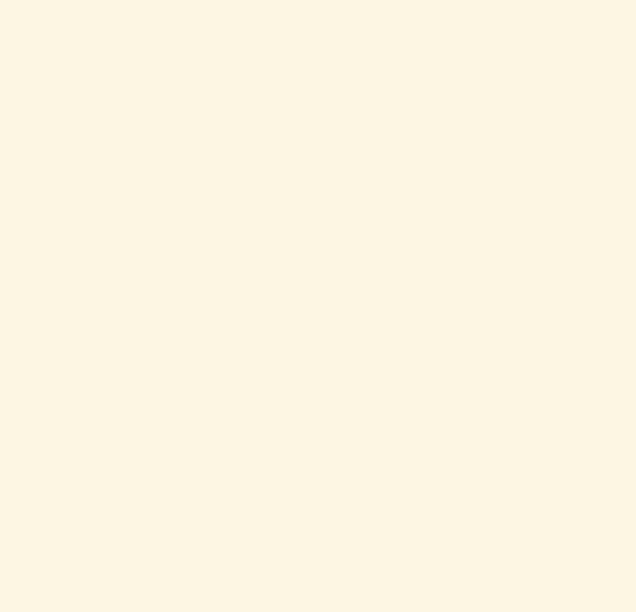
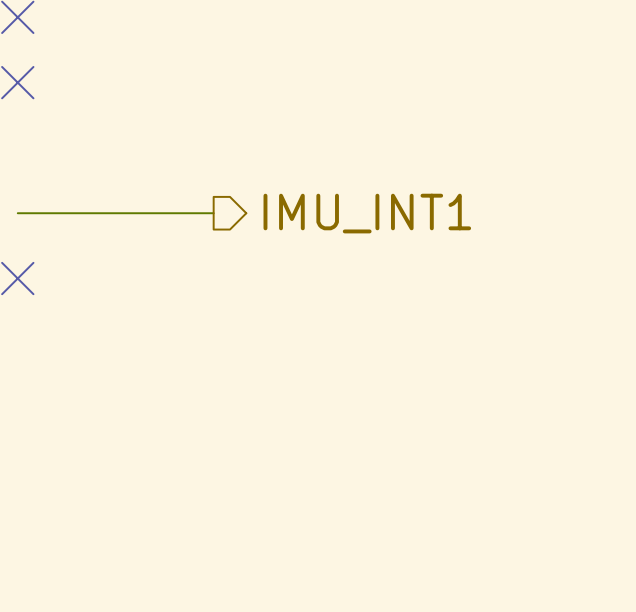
no-connect mark: none -> (17, 17)
no-connect mark: none -> (17, 82)
wire: none -> (17, 213) (213, 213)
hierarchical label: none -> IMU_INT1 (367, 213)
no-connect mark: none -> (17, 278)

